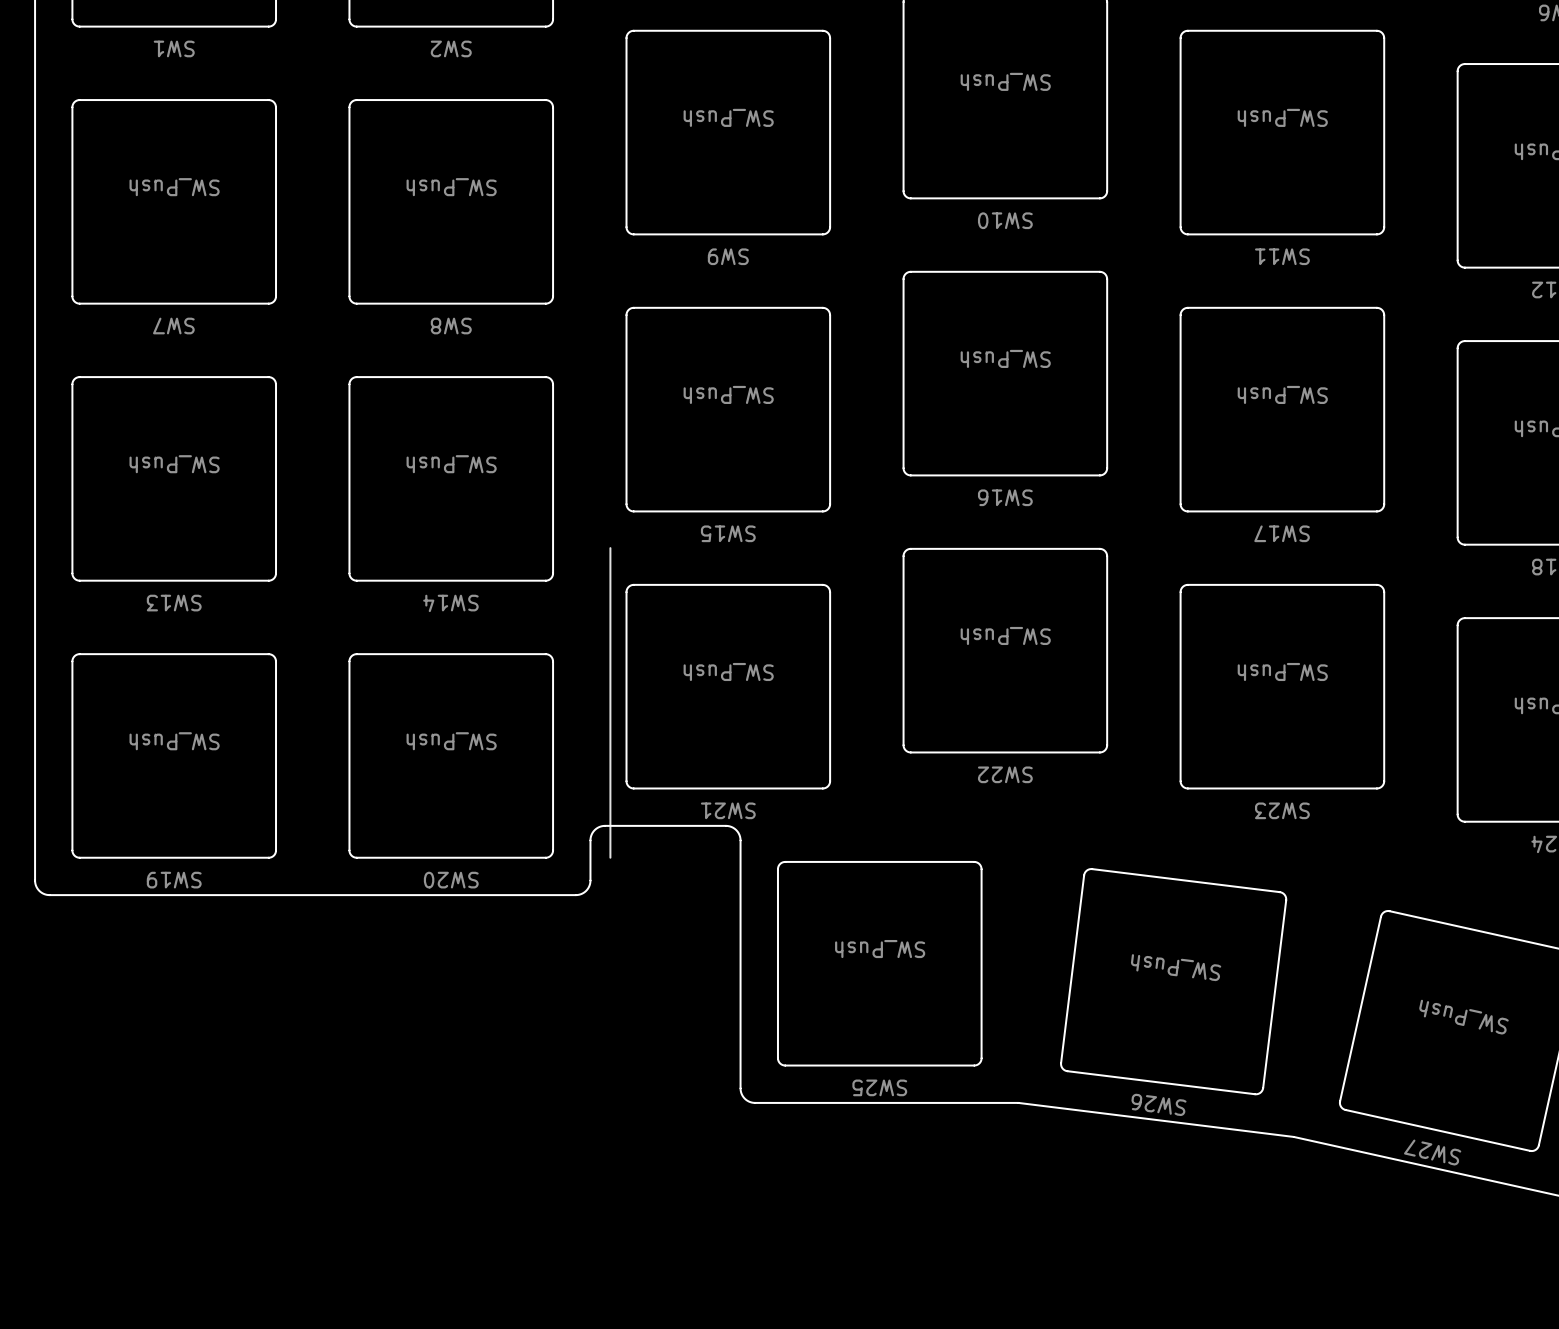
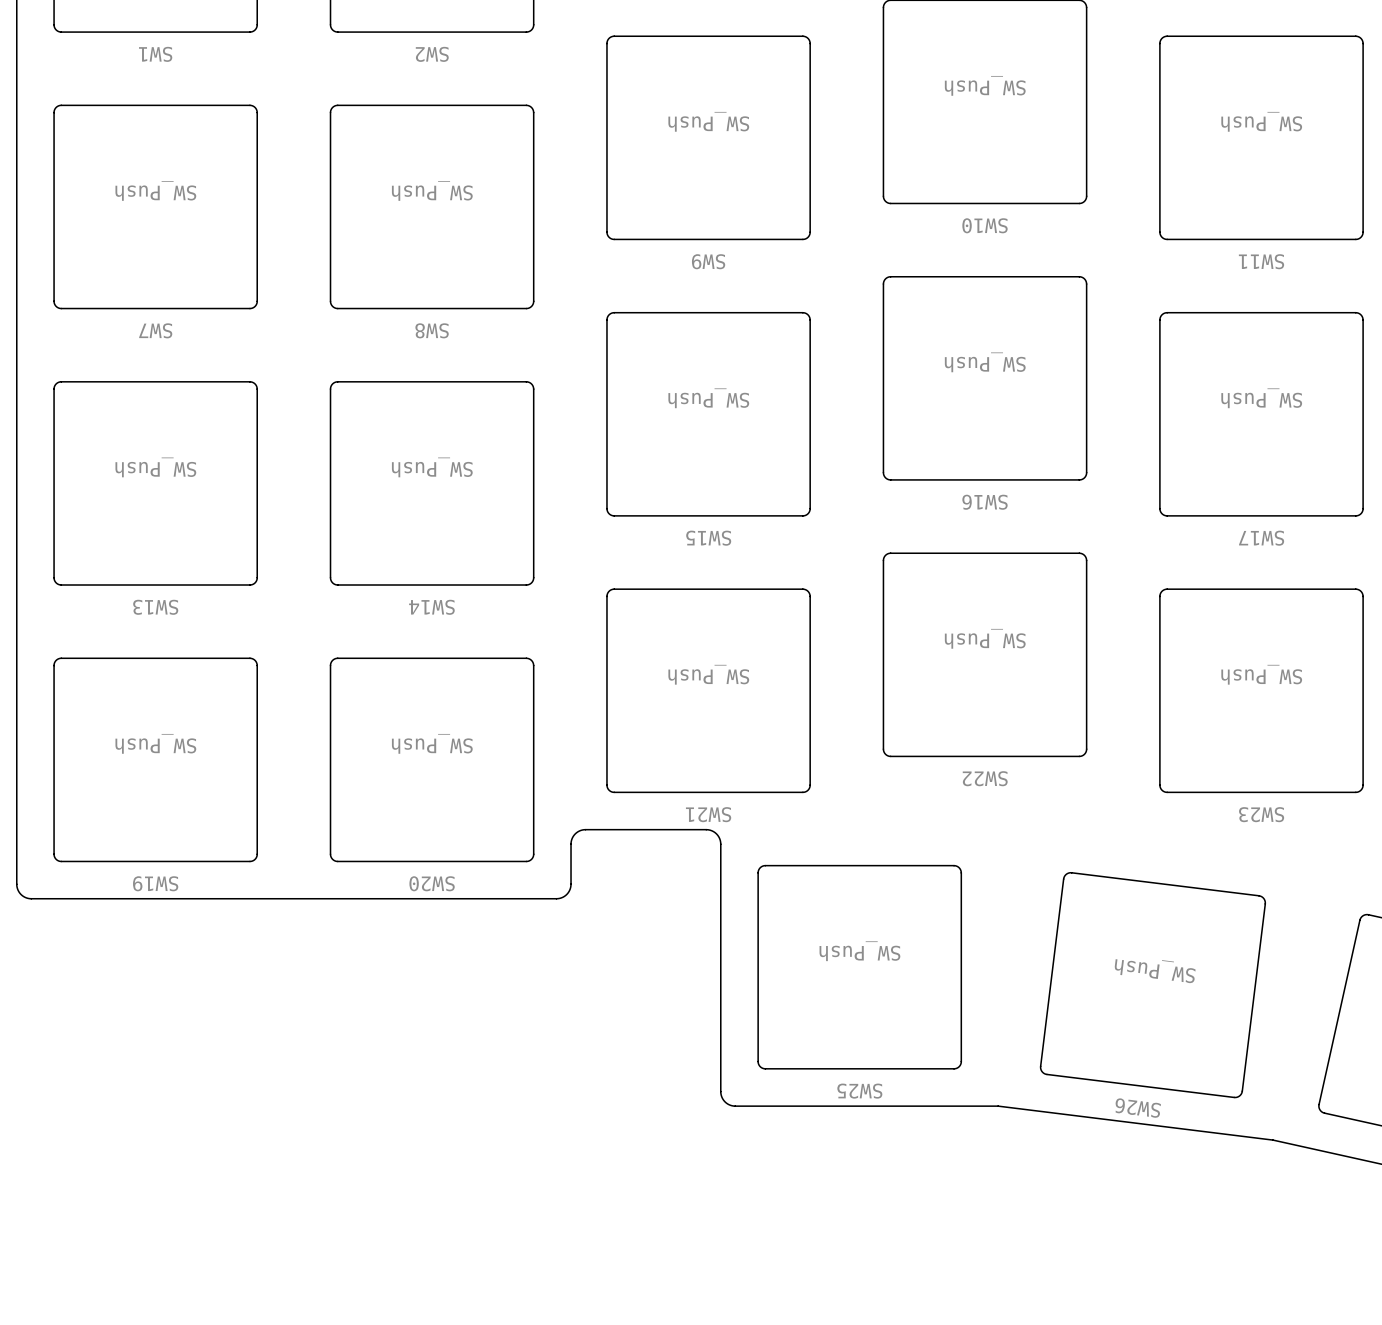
line: (610, 548) (610, 857) -> none

